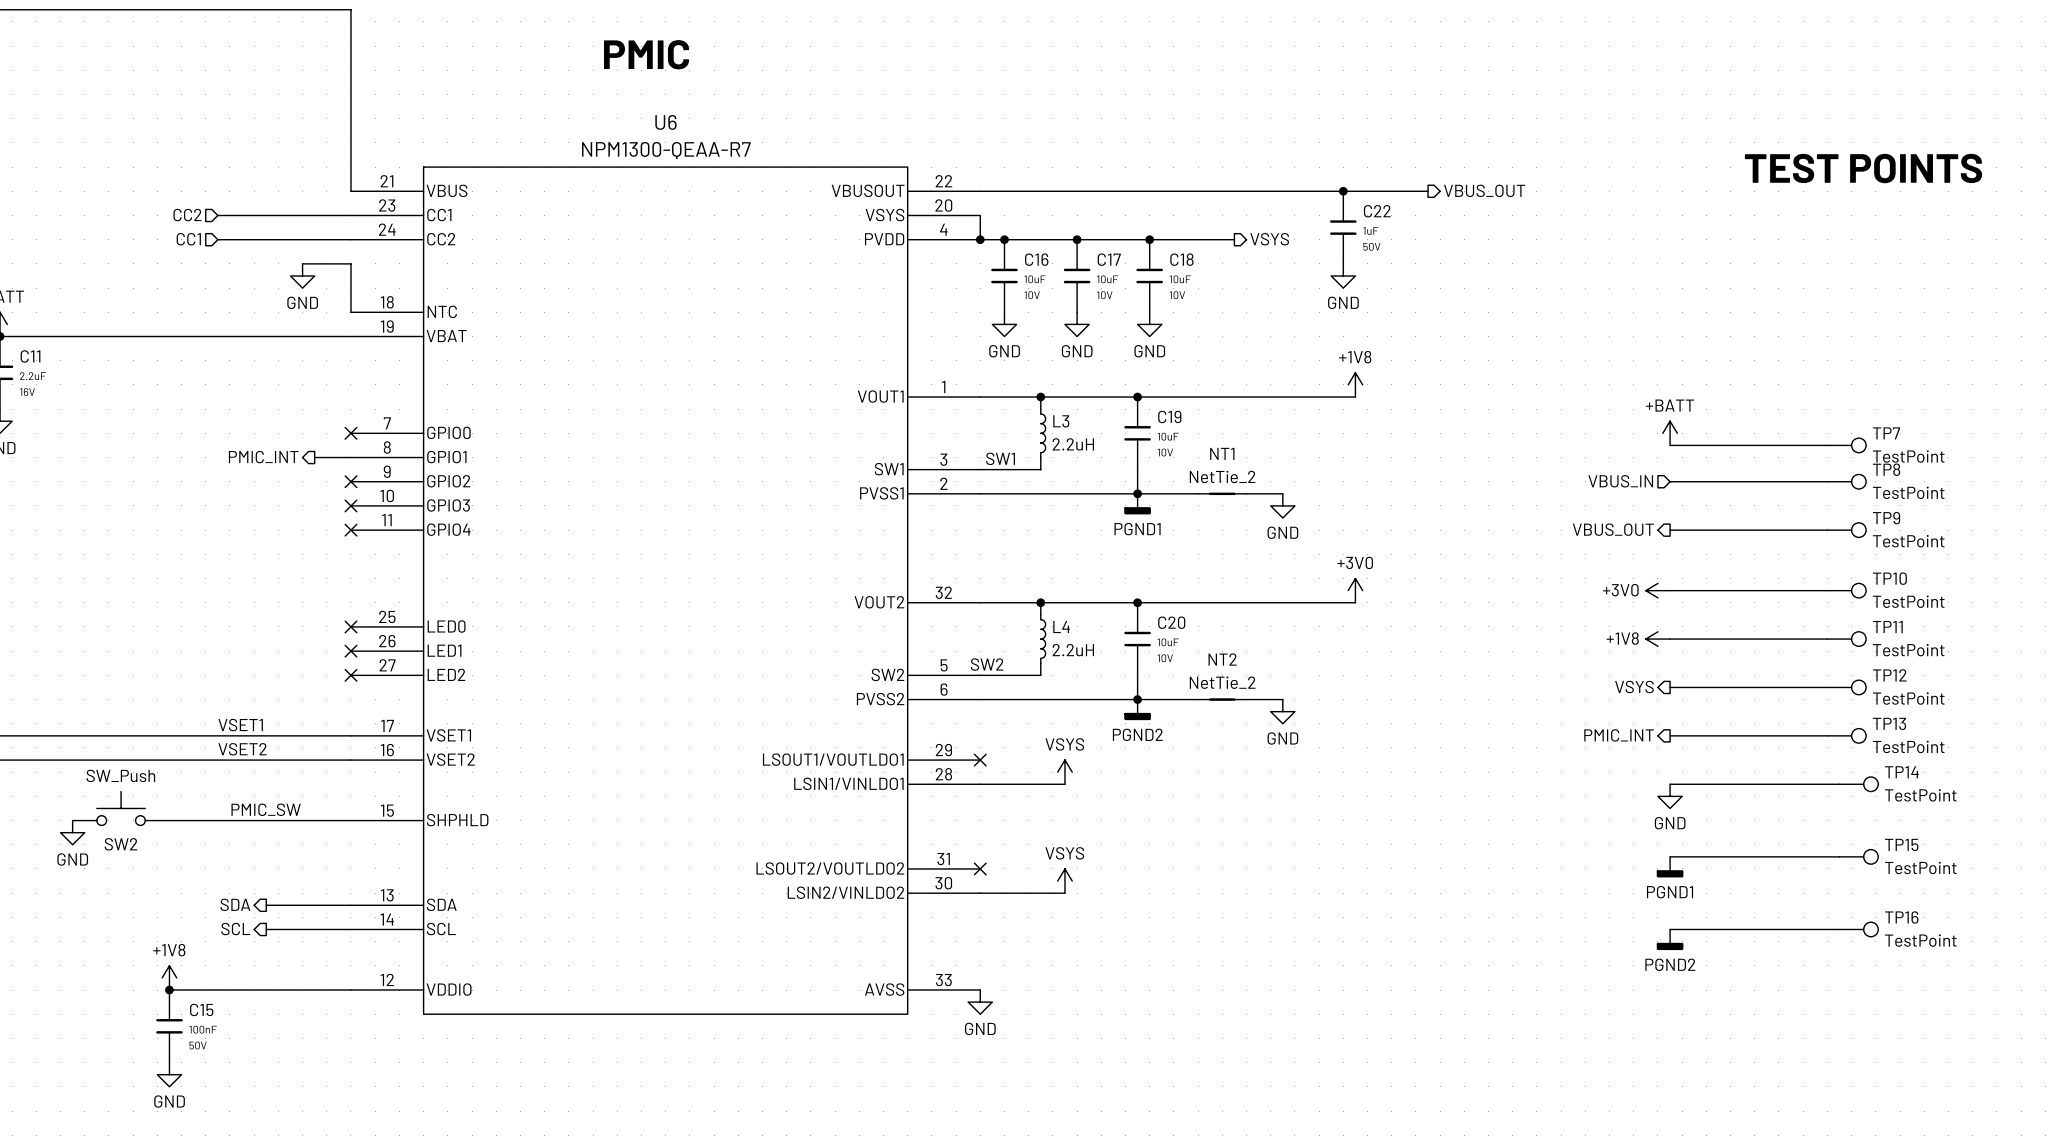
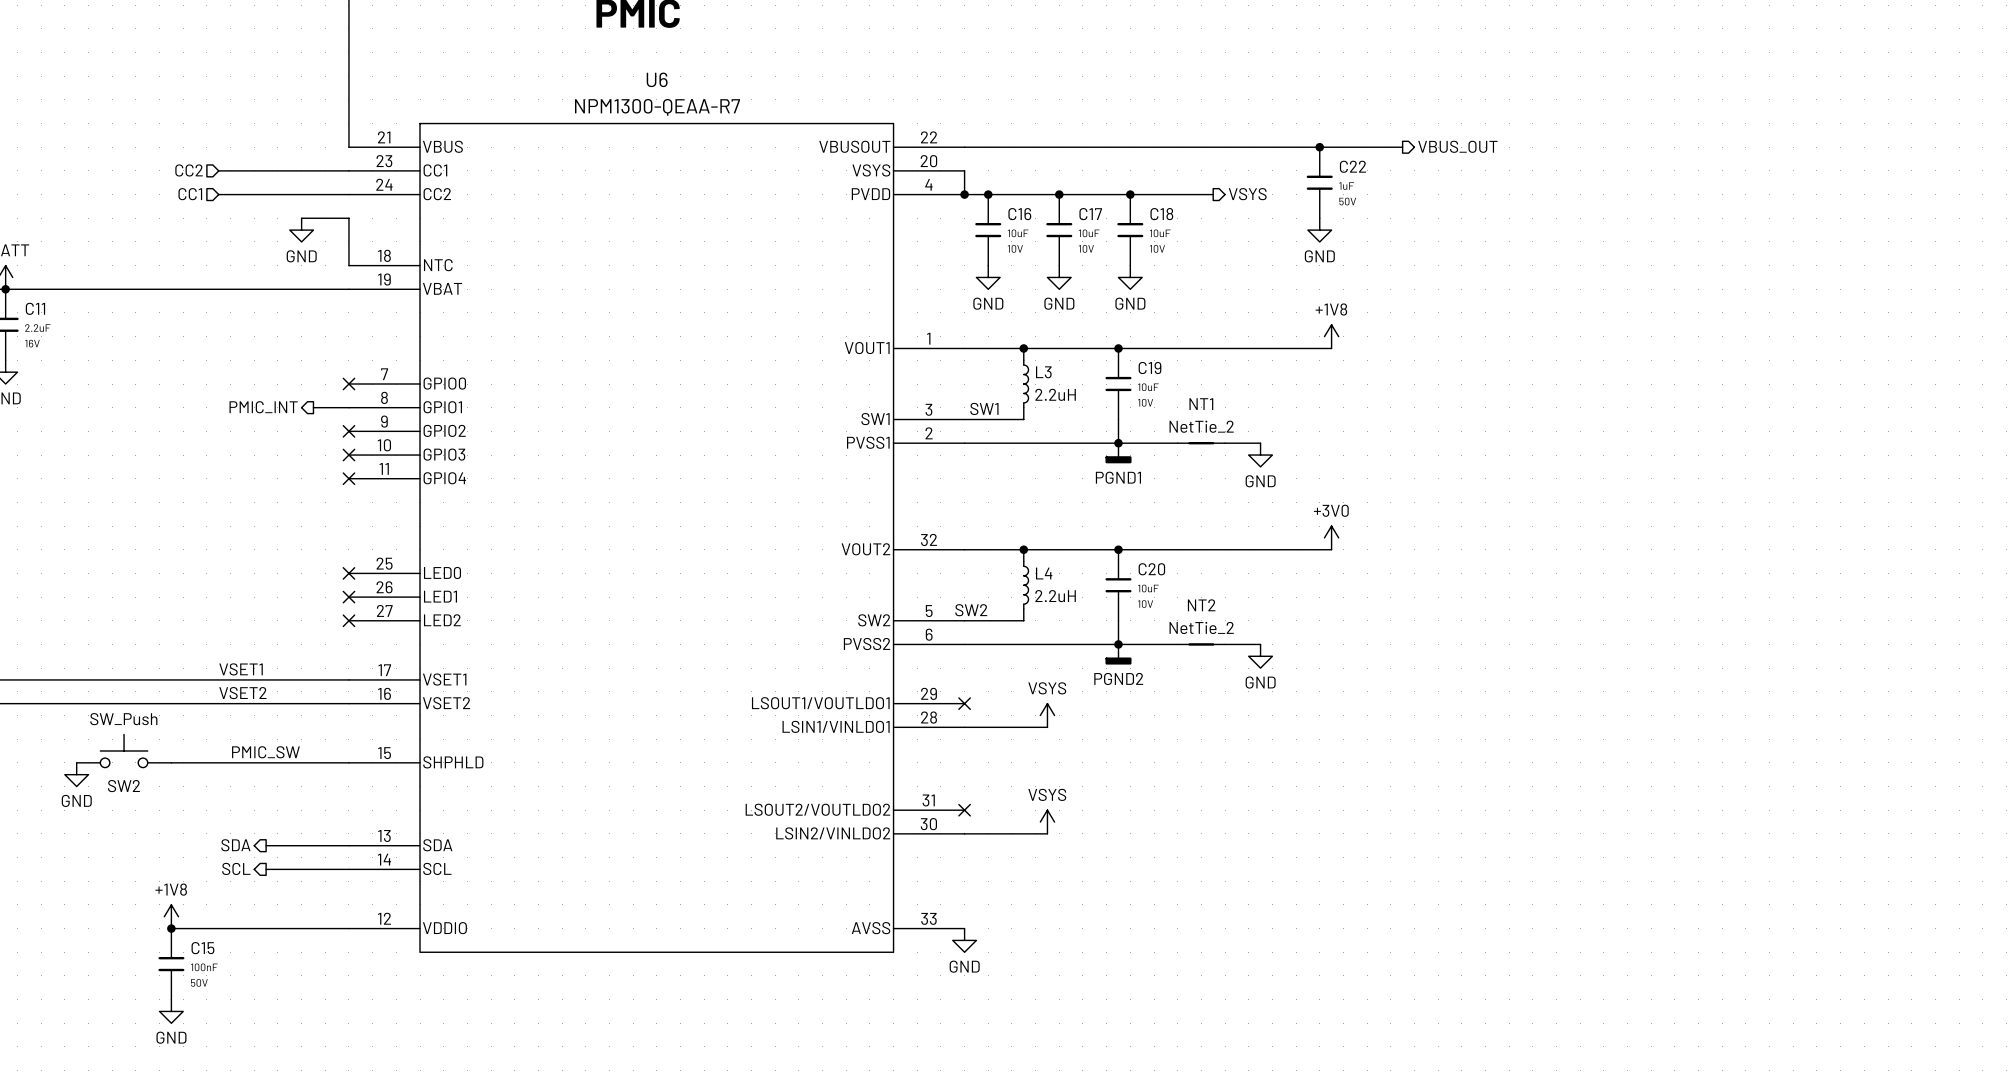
text: TEST POINTS (1863, 168) -> none
power symbol: +BATT (1670, 433) -> none
wire: (1670, 445) (1827, 445) -> none
TP7: TestPoint (1846, 445) -> none
hierarchical label: VBUS_IN (1620, 481) -> none
wire: (1670, 481) (1827, 481) -> none
TP8: TestPoint (1846, 481) -> none
hierarchical label: VBUS_OUT (1613, 529) -> none
wire: (1670, 530) (1827, 530) -> none
TP9: TestPoint (1846, 530) -> none
power symbol: +3V0 (1657, 590) -> none
wire: (1670, 590) (1827, 590) -> none
TP10: TestPoint (1846, 590) -> none
power symbol: +1V8 (1657, 639) -> none
wire: (1670, 639) (1827, 639) -> none
TP11: TestPoint (1846, 639) -> none
hierarchical label: VSYS (1634, 687) -> none
wire: (1670, 687) (1827, 687) -> none
TP12: TestPoint (1846, 687) -> none
hierarchical label: PMIC_INT (1619, 735) -> none
wire: (1670, 735) (1827, 735) -> none
TP13: TestPoint (1846, 735) -> none
wire: (1670, 784) (1839, 784) -> none
TP14: TestPoint (1858, 784) -> none
power symbol: GND (1670, 796) -> none
wire: (1670, 856) (1839, 856) -> none
TP15: TestPoint (1858, 856) -> none
power symbol: PGND1 (1670, 867) -> none
wire: (1670, 929) (1839, 929) -> none
TP16: TestPoint (1858, 929) -> none
power symbol: PGND2 (1670, 939) -> none

